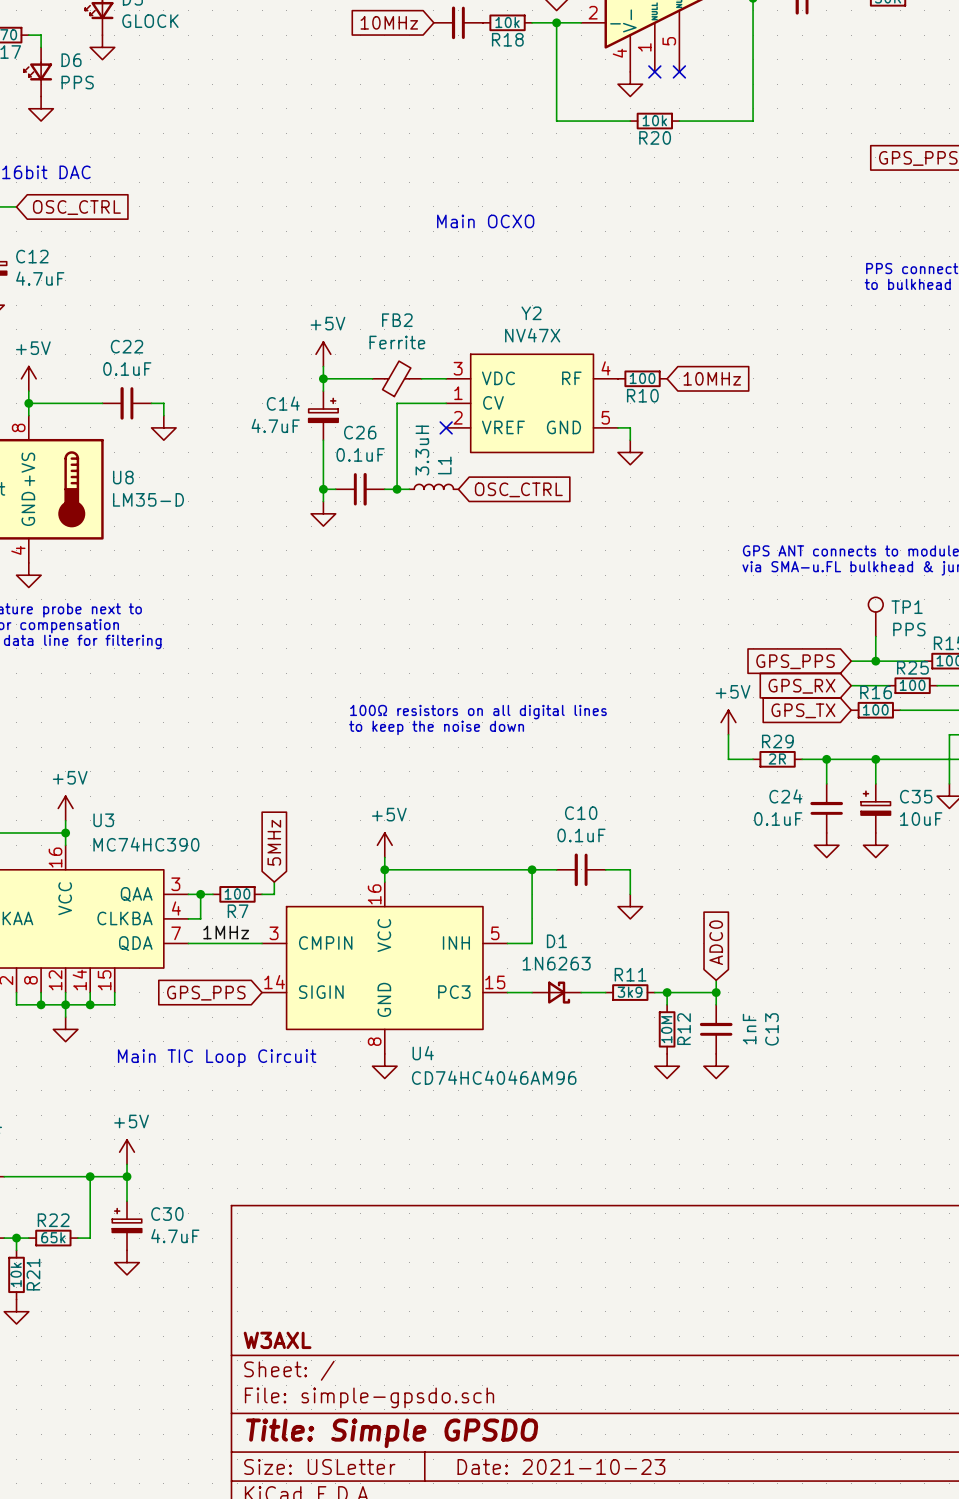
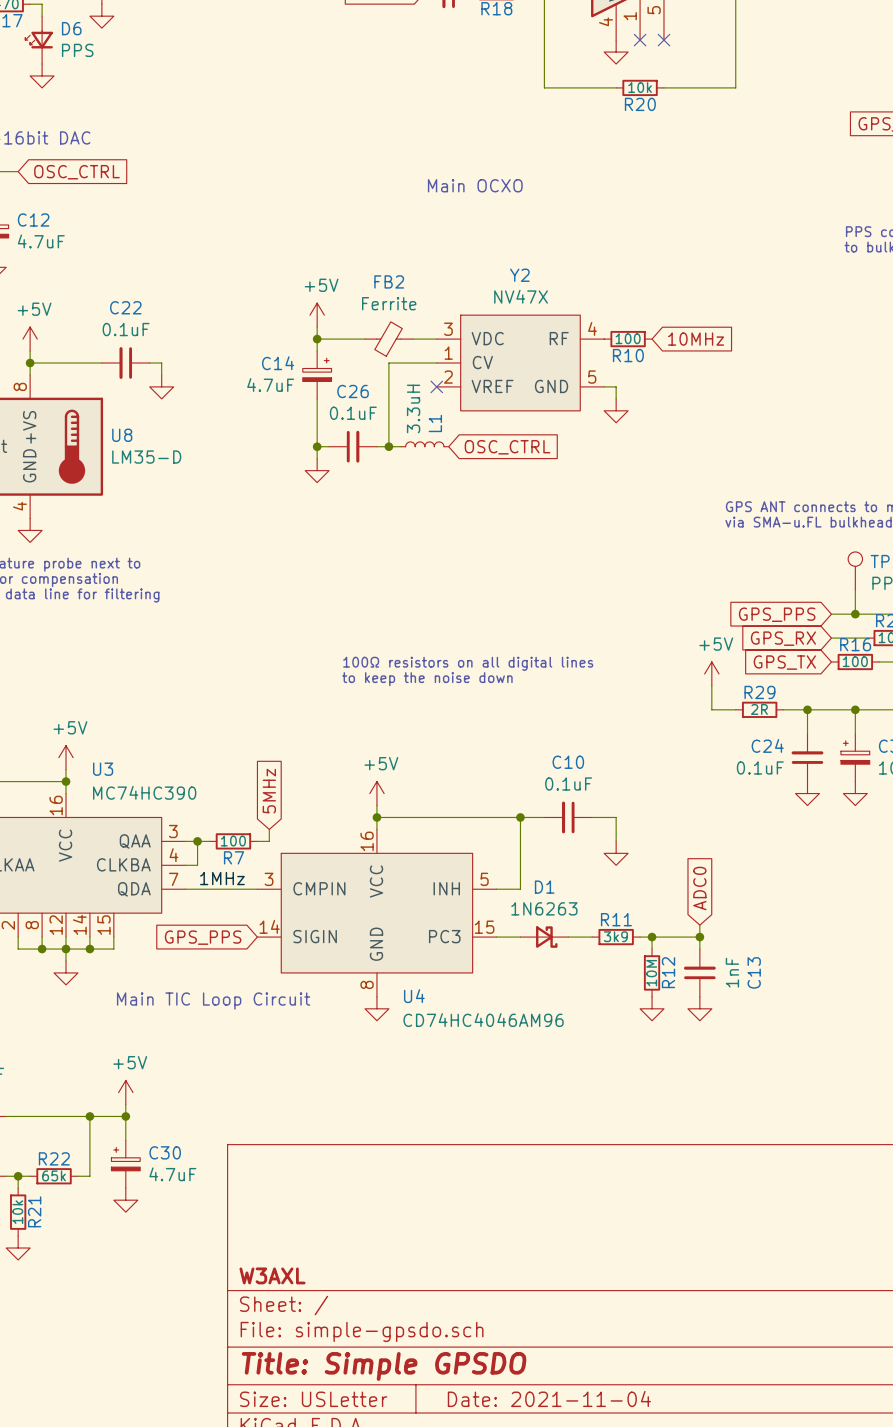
title block: Date: 2021-10-23 (561, 1466) -> Date: 2021-11-04 (549, 1398)

